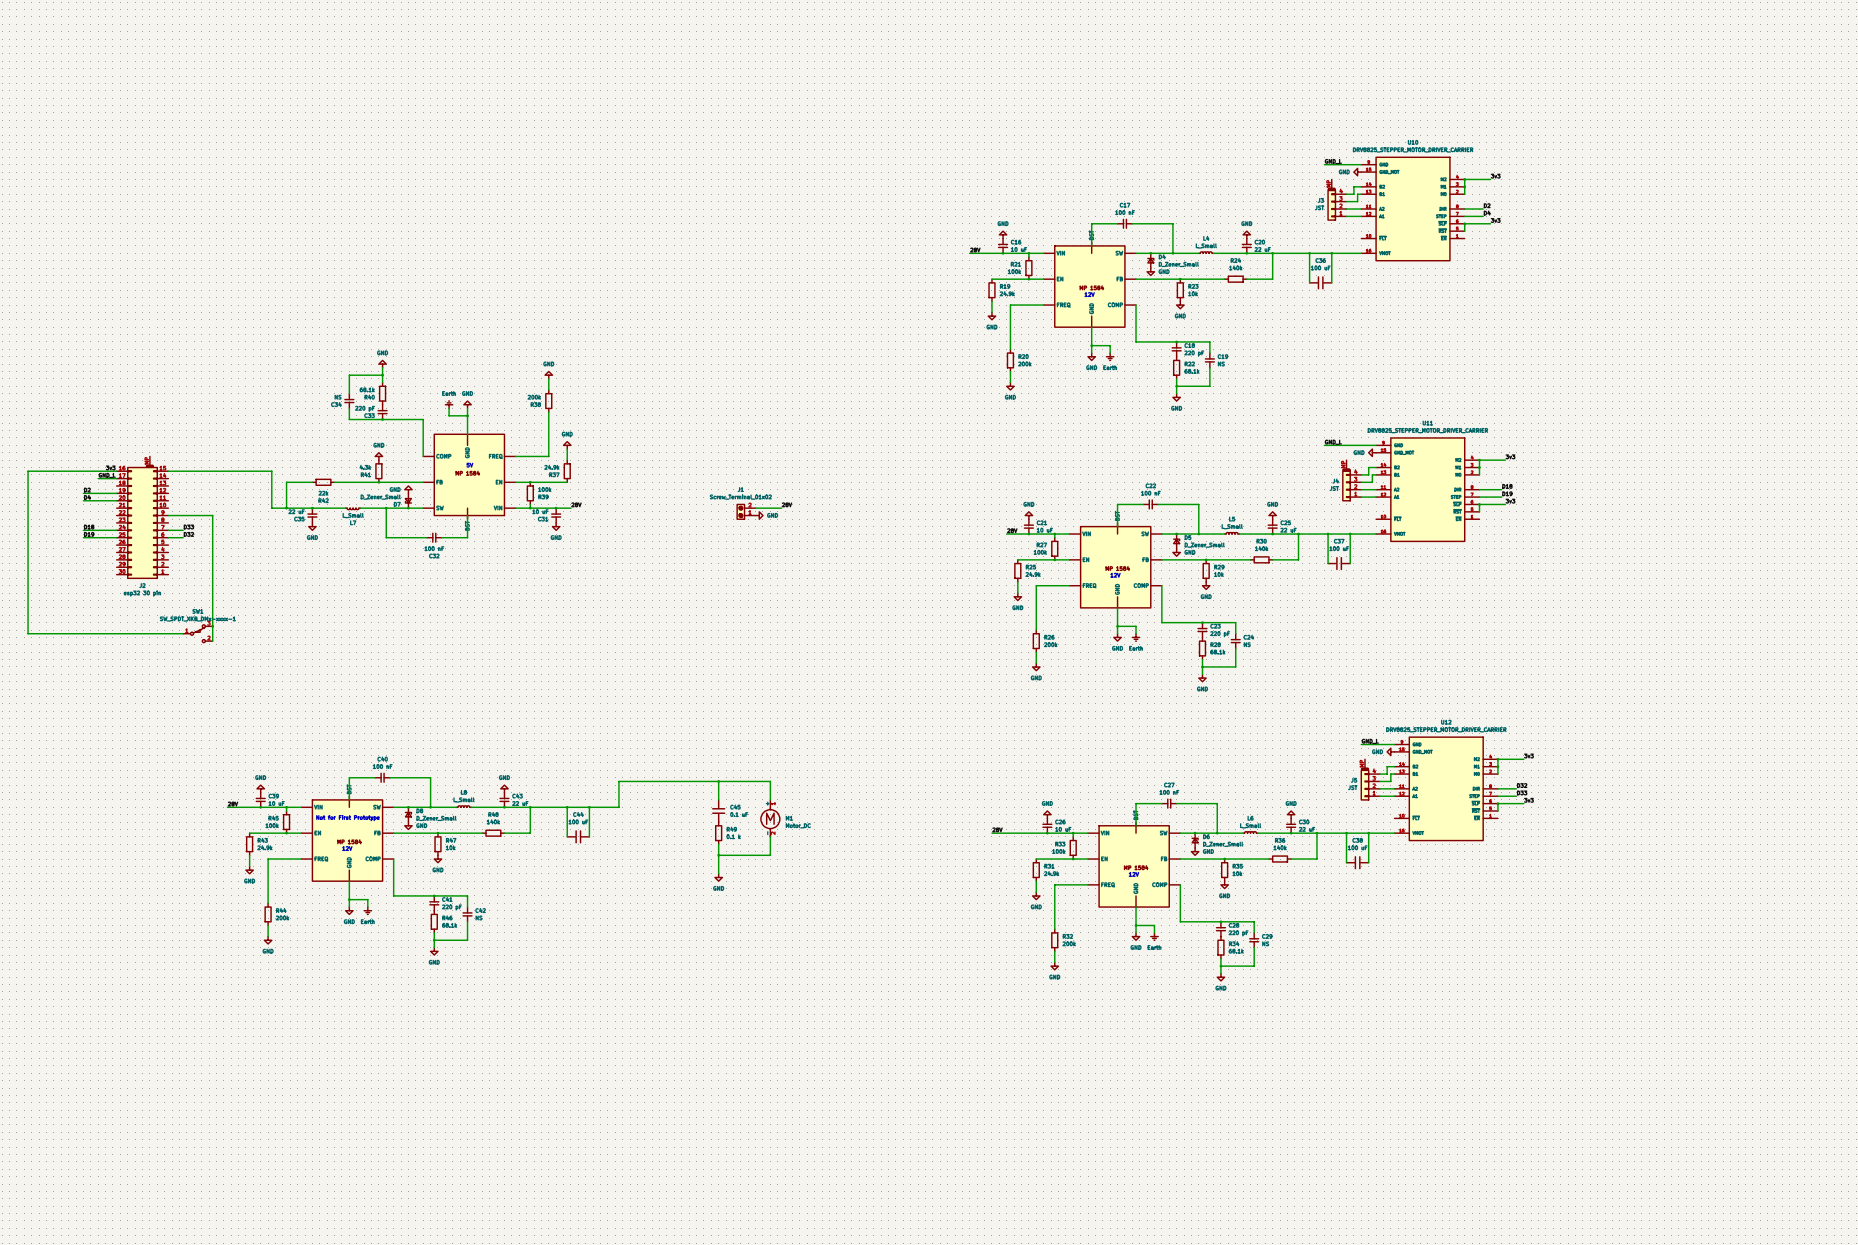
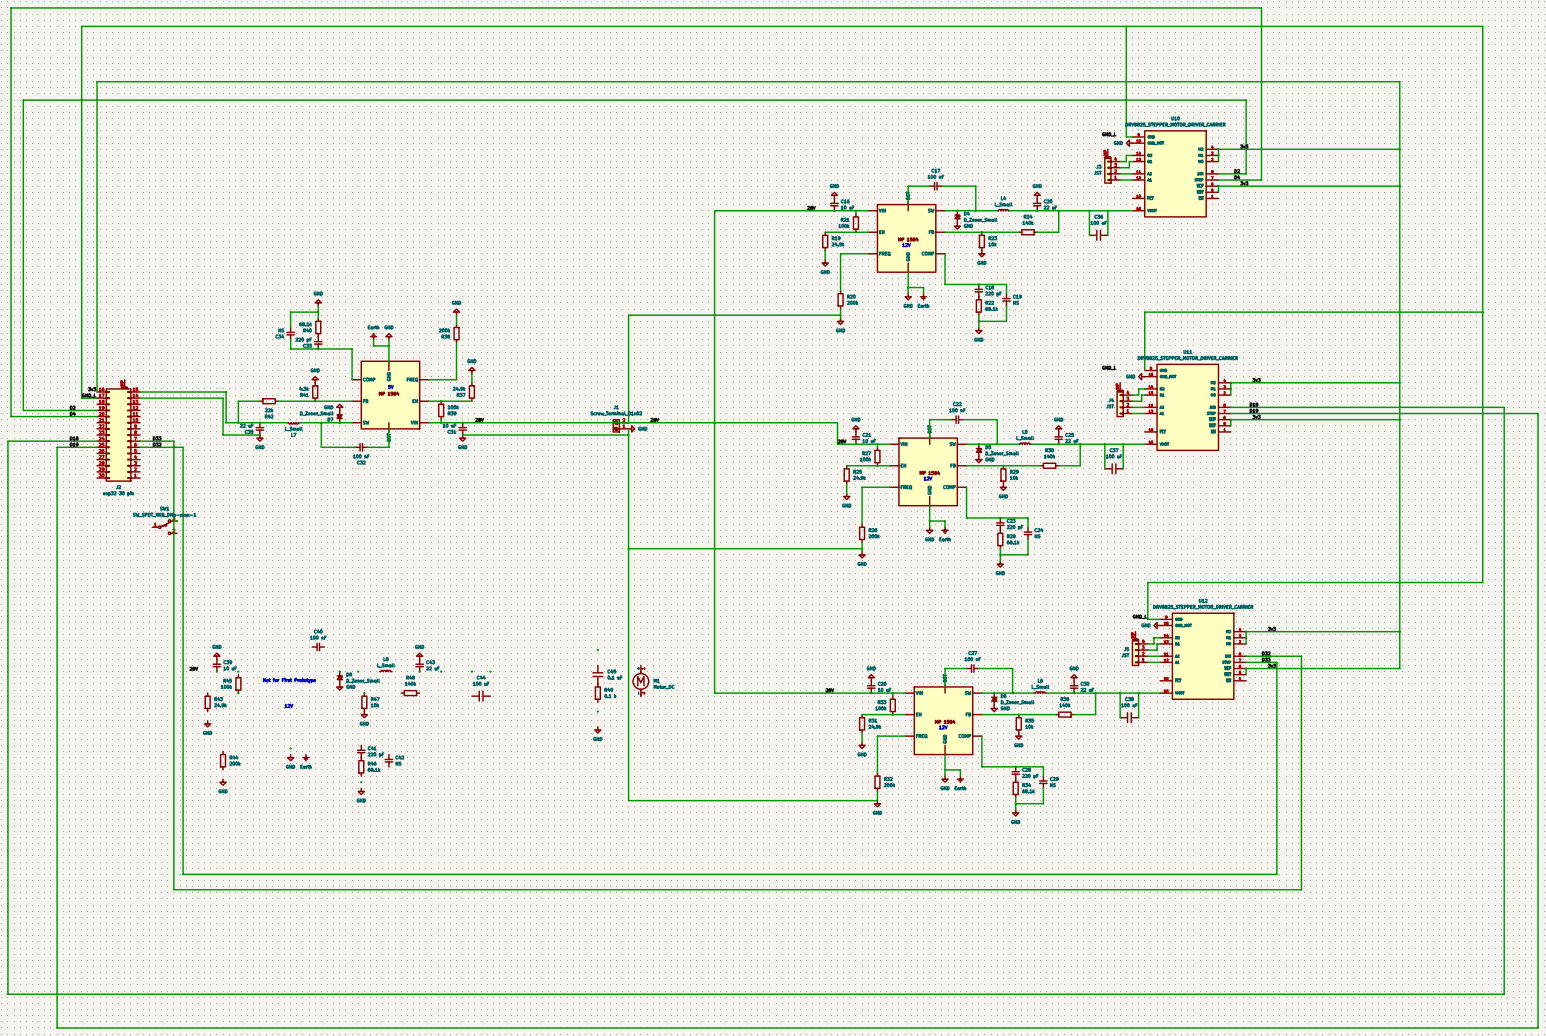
wire: (1324, 164) (1353, 164) -> (1126, 26) (1126, 137)
wire: none -> (1239, 149) (1399, 149)
wire: none -> (1233, 180) (1261, 180) (1261, 7) (11, 7) (11, 416) (69, 416)
wire: none -> (1239, 186) (1399, 186)
wire: none -> (806, 210) (714, 210) (714, 693) (825, 693)
wire: none -> (840, 315) (628, 315) (628, 422) (474, 422)
wire: (1324, 445) (1376, 445) -> (1482, 312) (1144, 312) (1144, 370)
wire: none -> (1252, 382) (1399, 382)
wire: (28, 471) (116, 471) -> (23, 392) (23, 100) (1246, 100) (1246, 173) (1233, 173)
wire: none -> (97, 392) (97, 81) (1399, 81) (1399, 668) (1267, 668)
wire: none -> (140, 398) (223, 398) (223, 435) (259, 435)
wire: none -> (1249, 407) (1504, 407) (1504, 994) (7, 994) (7, 441) (69, 441)
wire: (28, 493) (28, 633) (183, 633) -> (23, 410) (69, 410)
wire: none -> (1249, 413) (1538, 413) (1538, 1027) (57, 1027) (57, 447) (69, 447)
wire: none -> (1252, 419) (1399, 419)
wire: none -> (650, 422) (837, 422) (837, 444)
wire: (168, 515) (212, 515) (212, 641) -> none
wire: none -> (628, 428) (628, 800) (877, 800)
wire: none -> (462, 435) (628, 435)
wire: none -> (152, 441) (173, 441) (173, 889) (1301, 889) (1301, 656) (1261, 656)
wire: none -> (152, 447) (183, 447) (183, 874) (1276, 874) (1276, 662) (1261, 662)
wire: none -> (628, 548) (862, 548)
wire: (1361, 744) (1379, 744) -> (81, 398) (81, 26) (1482, 26) (1482, 582) (1147, 582) (1147, 619)
wire: none -> (1267, 631) (1399, 631)
wire: (375, 777) (349, 777) (349, 799) -> none
wire: (389, 777) (430, 777) (430, 807) -> none
wire: (718, 781) (718, 799) -> none
wire: (770, 799) (770, 781) (618, 781) (618, 807) (471, 807) -> none
wire: (227, 807) (301, 807) -> none
wire: (286, 807) (286, 811) -> none
wire: (393, 807) (456, 807) -> none
wire: (530, 807) (530, 833) (504, 833) -> none
wire: (567, 807) (567, 836) -> none
wire: (589, 807) (589, 836) -> none
wire: (249, 833) (301, 833) -> none
wire: (393, 833) (482, 833) -> none
wire: (770, 836) (770, 855) (718, 855) -> none
part: (347, 838) -> none
wire: (718, 844) (718, 873) -> none
wire: (249, 855) (249, 866) -> none
wire: (301, 859) (268, 859) (268, 903) -> none
wire: (393, 859) (393, 895) (467, 895) (467, 907) -> none
wire: (349, 881) (349, 907) -> none
wire: (349, 899) (367, 899) (367, 907) -> none
wire: (467, 921) (467, 940) (434, 940) -> none
wire: (268, 925) (268, 936) -> none
wire: (434, 932) (434, 947) -> none

